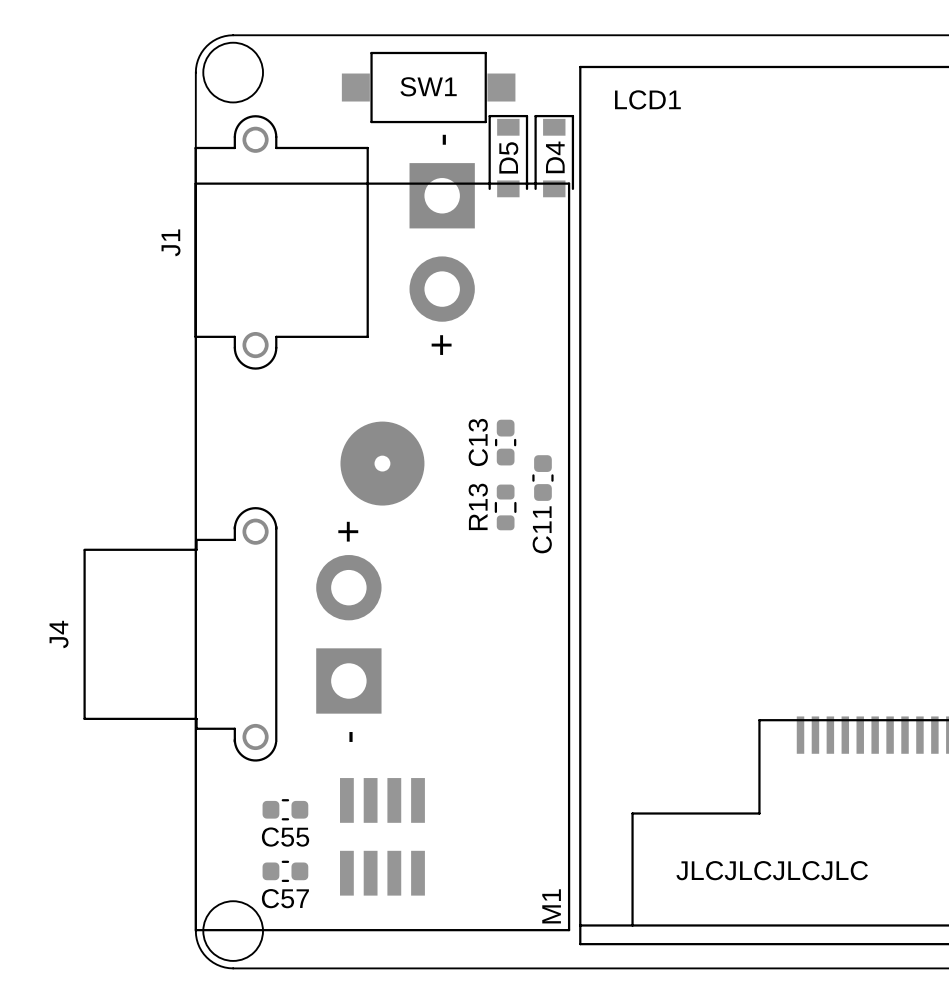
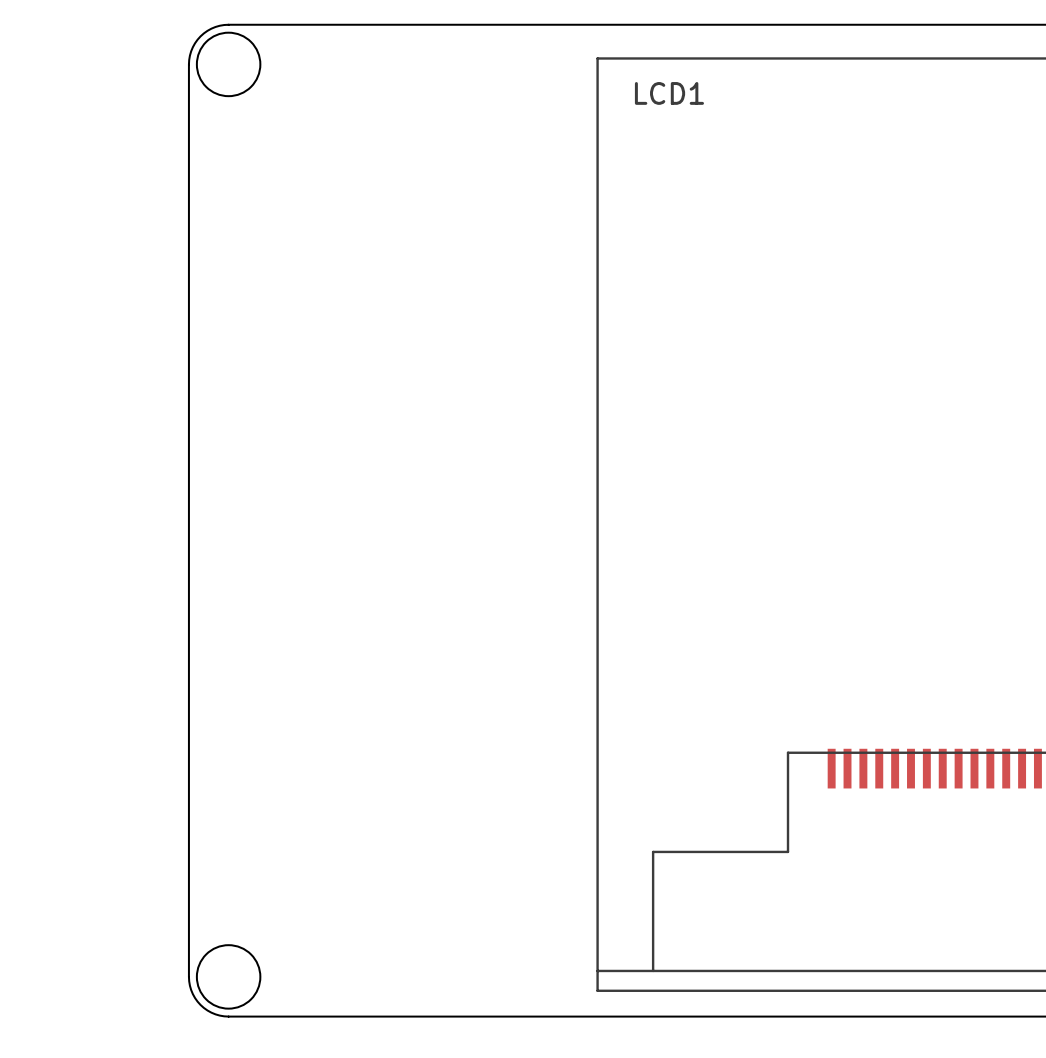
SW1: (428, 87) -> none
D5: (508, 156) -> none
D4: (554, 156) -> none
J1: (334, 242) -> none
C13: (505, 442) -> none
C11: (542, 478) -> none
R13: (505, 507) -> none
M1: (382, 556) -> none
J4: (232, 634) -> none
C55: (285, 809) -> none
text: JLCJLCJLCJLC (772, 870) -> none
C57: (285, 871) -> none

